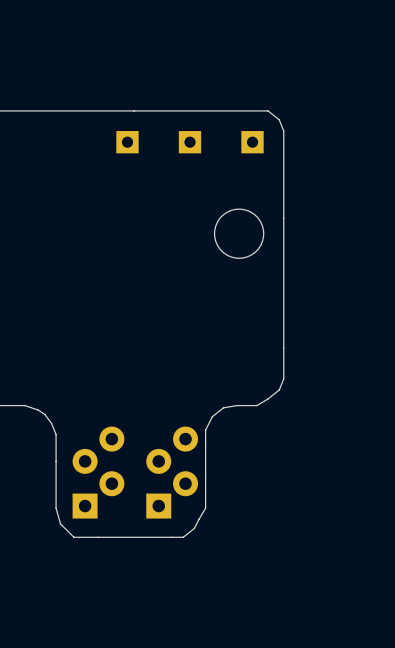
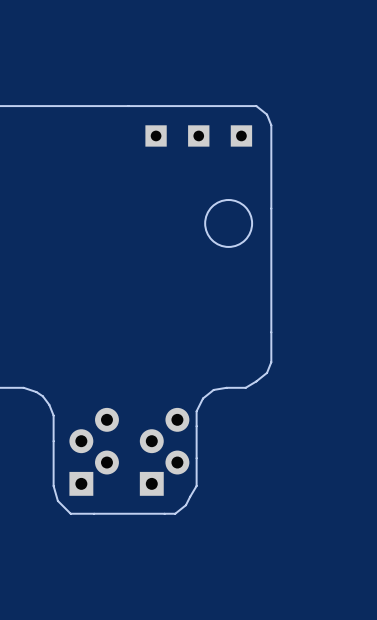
part: (127, 142) -> none
part: none -> (156, 135)
part: (190, 142) -> none
part: none -> (198, 135)

